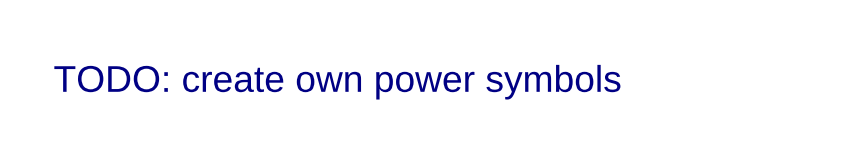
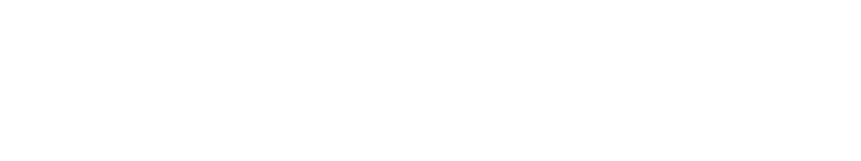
text: TODO: create own power symbols (337, 82) -> none

